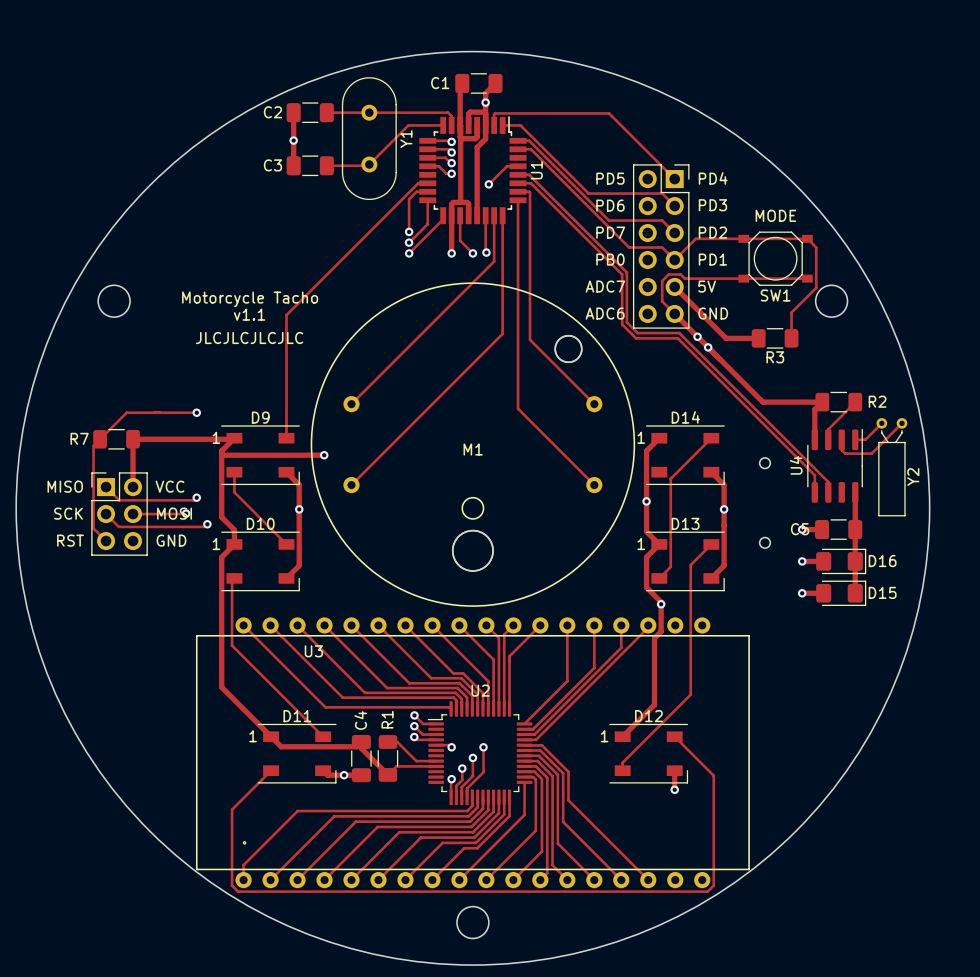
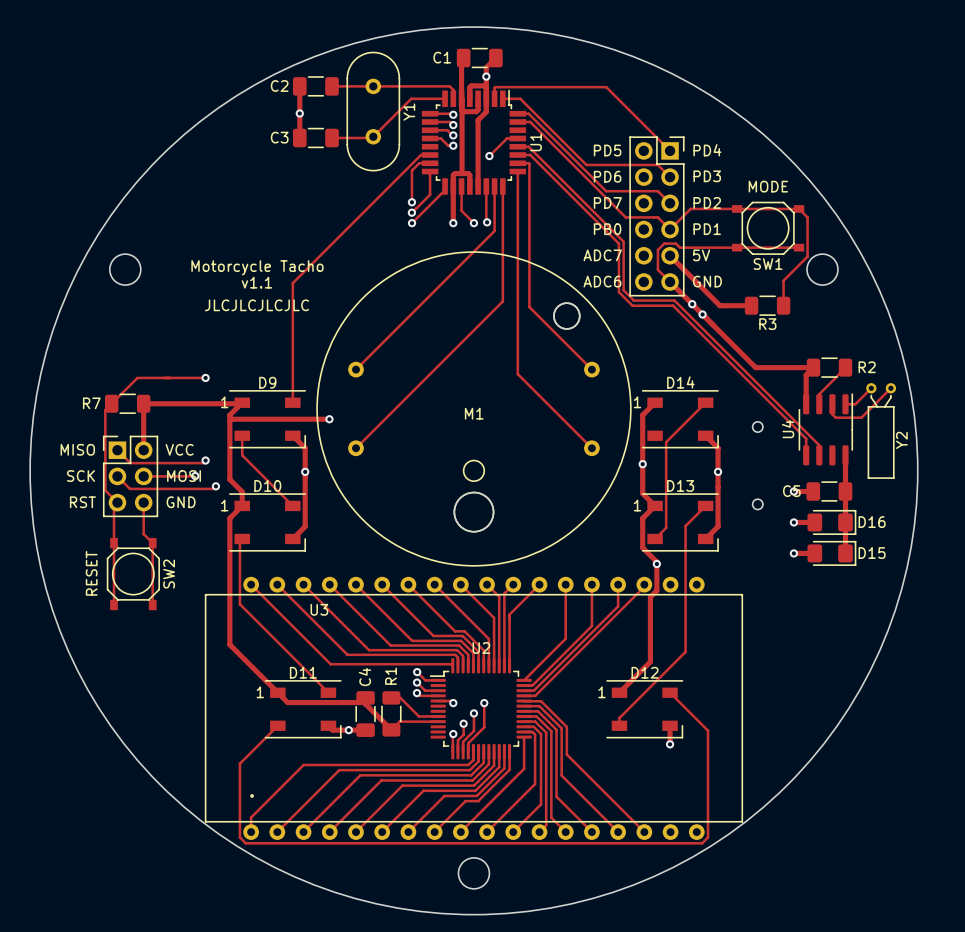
track: none -> (117, 502) (114, 506) (114, 605)
track: none -> (143, 502) (143, 534) (152, 543) (152, 605)
text: none -> RESET (91, 573)
SW2: none -> (133, 574)

